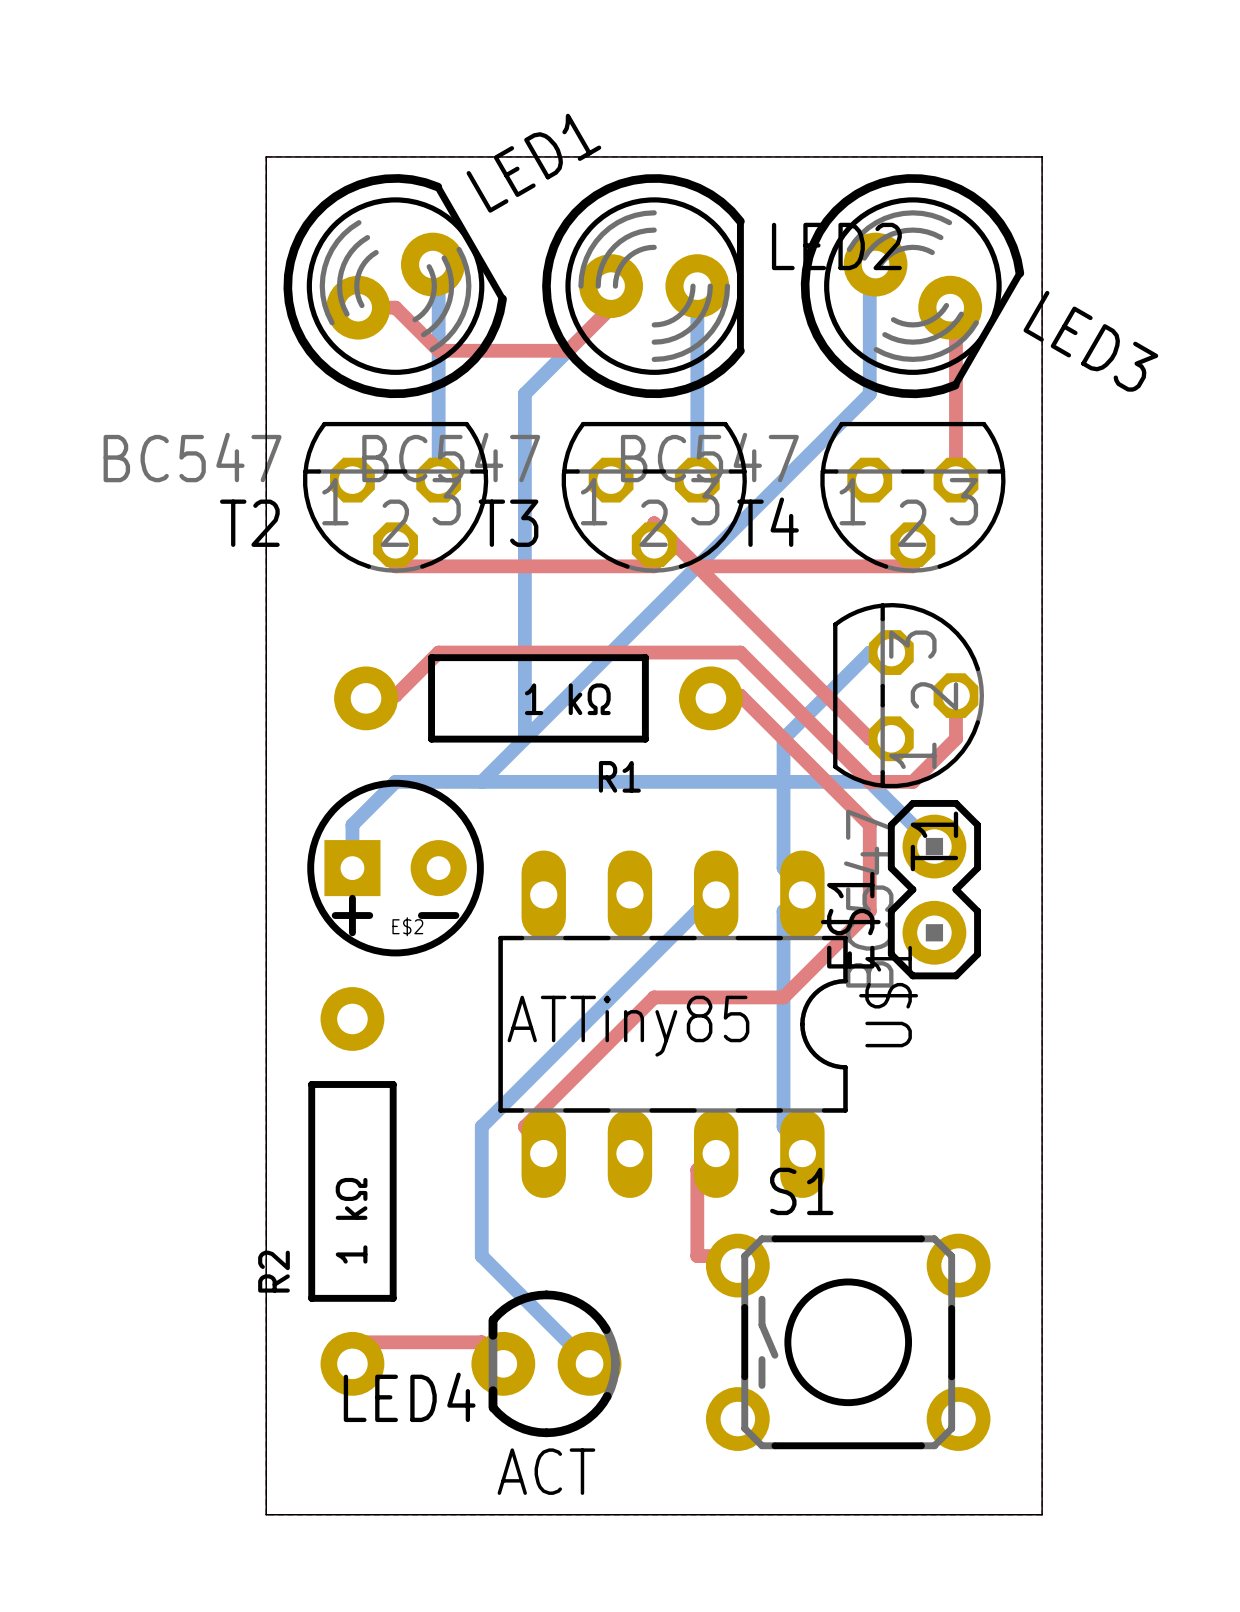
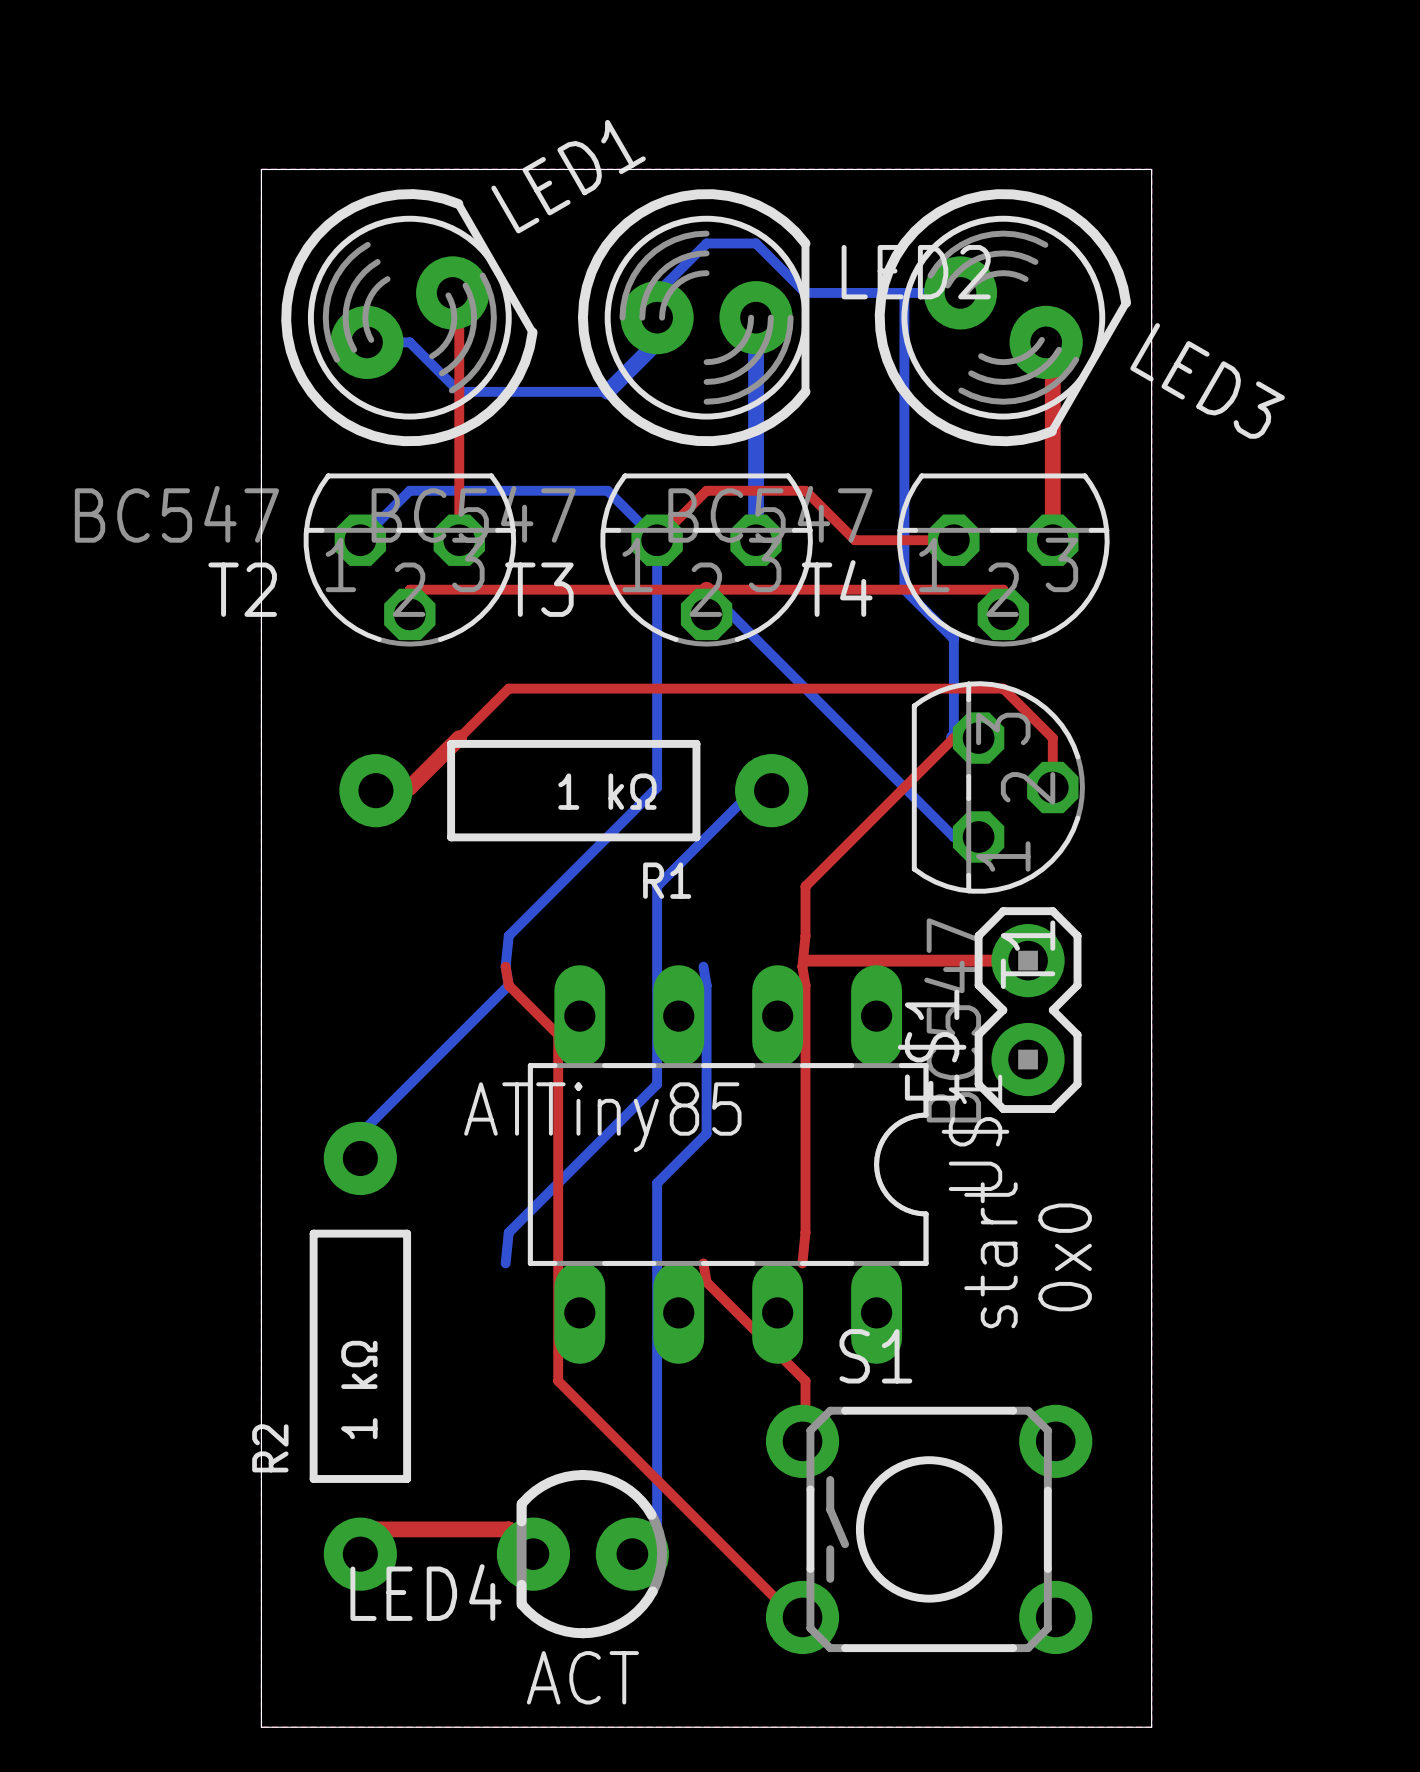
top track: none -> (452, 292) (459, 292) (459, 540)
bottom track: (432, 264) (438, 264) (438, 480) -> none
bottom track: (869, 264) (869, 393) (481, 781) -> (953, 292) (805, 292) (756, 243) (706, 243) (657, 292) (657, 317)
top track: (611, 286) (611, 307) (567, 350) (438, 350) (395, 307) (352, 307) -> none
bottom track: (567, 350) (524, 393) (524, 738) -> (607, 391) (459, 391) (409, 342) (360, 342)
bottom track: none -> (360, 540) (409, 490) (607, 490) (657, 540) (657, 787) (508, 935) (505, 966) (508, 985) (360, 1133) (360, 1158)
top track: none -> (657, 540) (706, 490) (805, 490) (854, 540) (953, 540)
top track: (654, 523) (869, 738) (891, 738) -> none
top track: (395, 544) (395, 566) (654, 566) (654, 544) -> (409, 614) (409, 589) (1003, 589) (1003, 614)
bottom track: none -> (706, 614) (706, 589) (953, 836) (978, 836)
top track: (912, 544) (912, 566) (697, 566) -> none
top track: (438, 652) (740, 652) (869, 781) (912, 781) (955, 738) (955, 695) -> (459, 738) (508, 688) (1003, 688) (1052, 738) (1052, 787)
bottom track: (869, 652) (783, 738) (783, 868) (802, 894) (783, 911) (783, 1126) (802, 1153) -> (953, 738) (953, 639) (904, 589) (904, 292)
top track: none -> (978, 738) (953, 738) (805, 886) (805, 935) (802, 966) (805, 985) (805, 1232) (802, 1263)
top track: (710, 698) (740, 695) (869, 824) (869, 911) (783, 997) (654, 997) (524, 1126) (543, 1153) -> none
bottom track: none -> (771, 790) (756, 787) (657, 886) (657, 1084) (508, 1232) (505, 1263)
top track: none -> (805, 960) (1028, 960)
bottom track: (934, 846) (869, 781) (395, 781) (352, 824) (352, 868) -> none
top track: none -> (505, 966) (508, 985) (558, 1034) (558, 1381) (805, 1628) (802, 1617)
E$2: (395, 868) -> none
bottom track: (716, 894) (697, 911) (481, 1126) (481, 1256) (589, 1363) -> (703, 966) (706, 985) (706, 1133) (657, 1183) (657, 1529) (632, 1554)
text position: ATTiny85 (628, 1026) -> ATTiny85 (602, 1117)
text: none -> start (990, 1255)
text: none -> 0x0 (1065, 1257)
top track: (716, 1153) (697, 1169) (697, 1256) (740, 1256) -> (703, 1263) (706, 1282) (805, 1381) (805, 1430)

